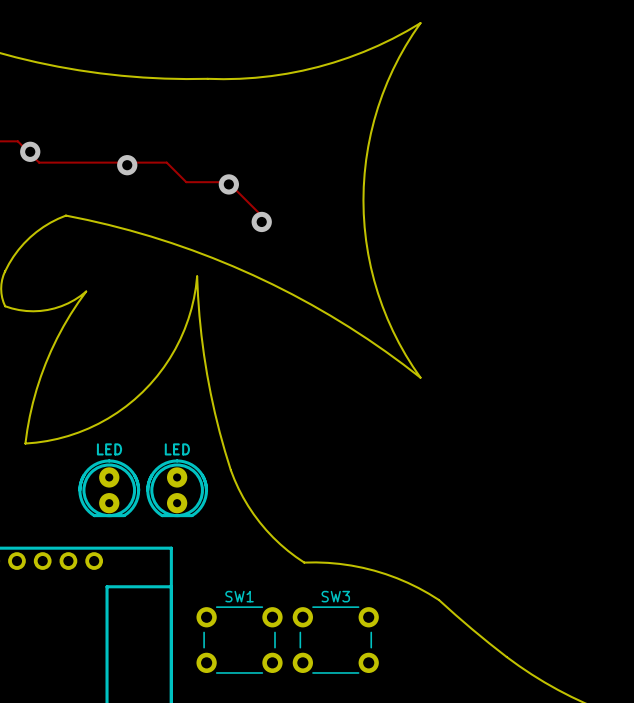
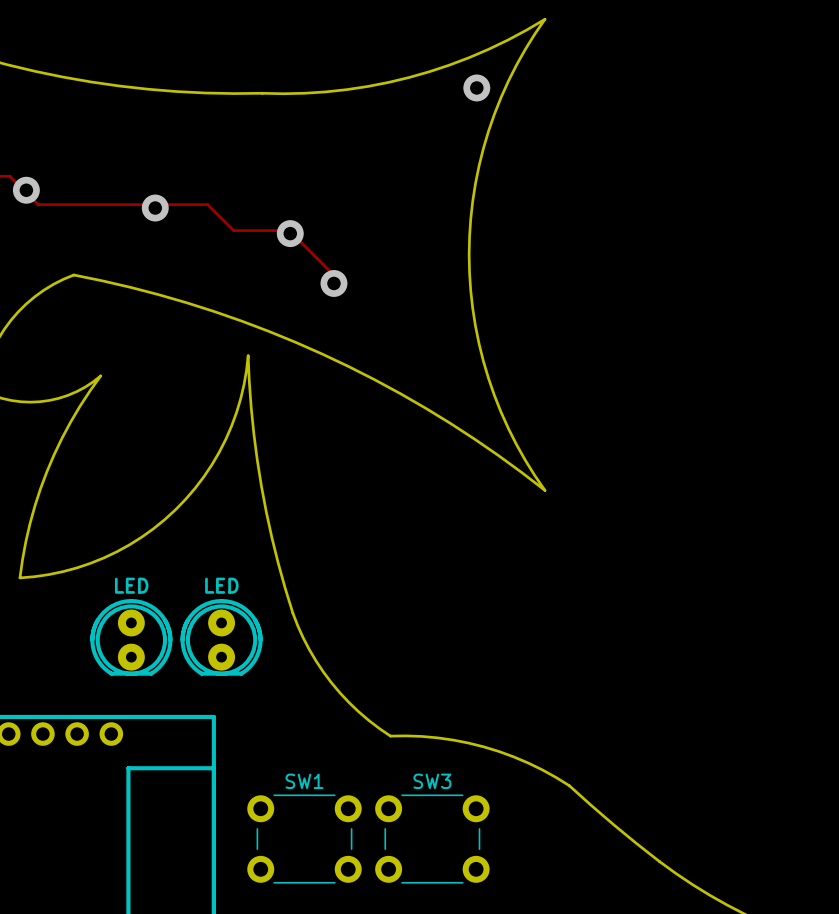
via: none -> (476, 87)

